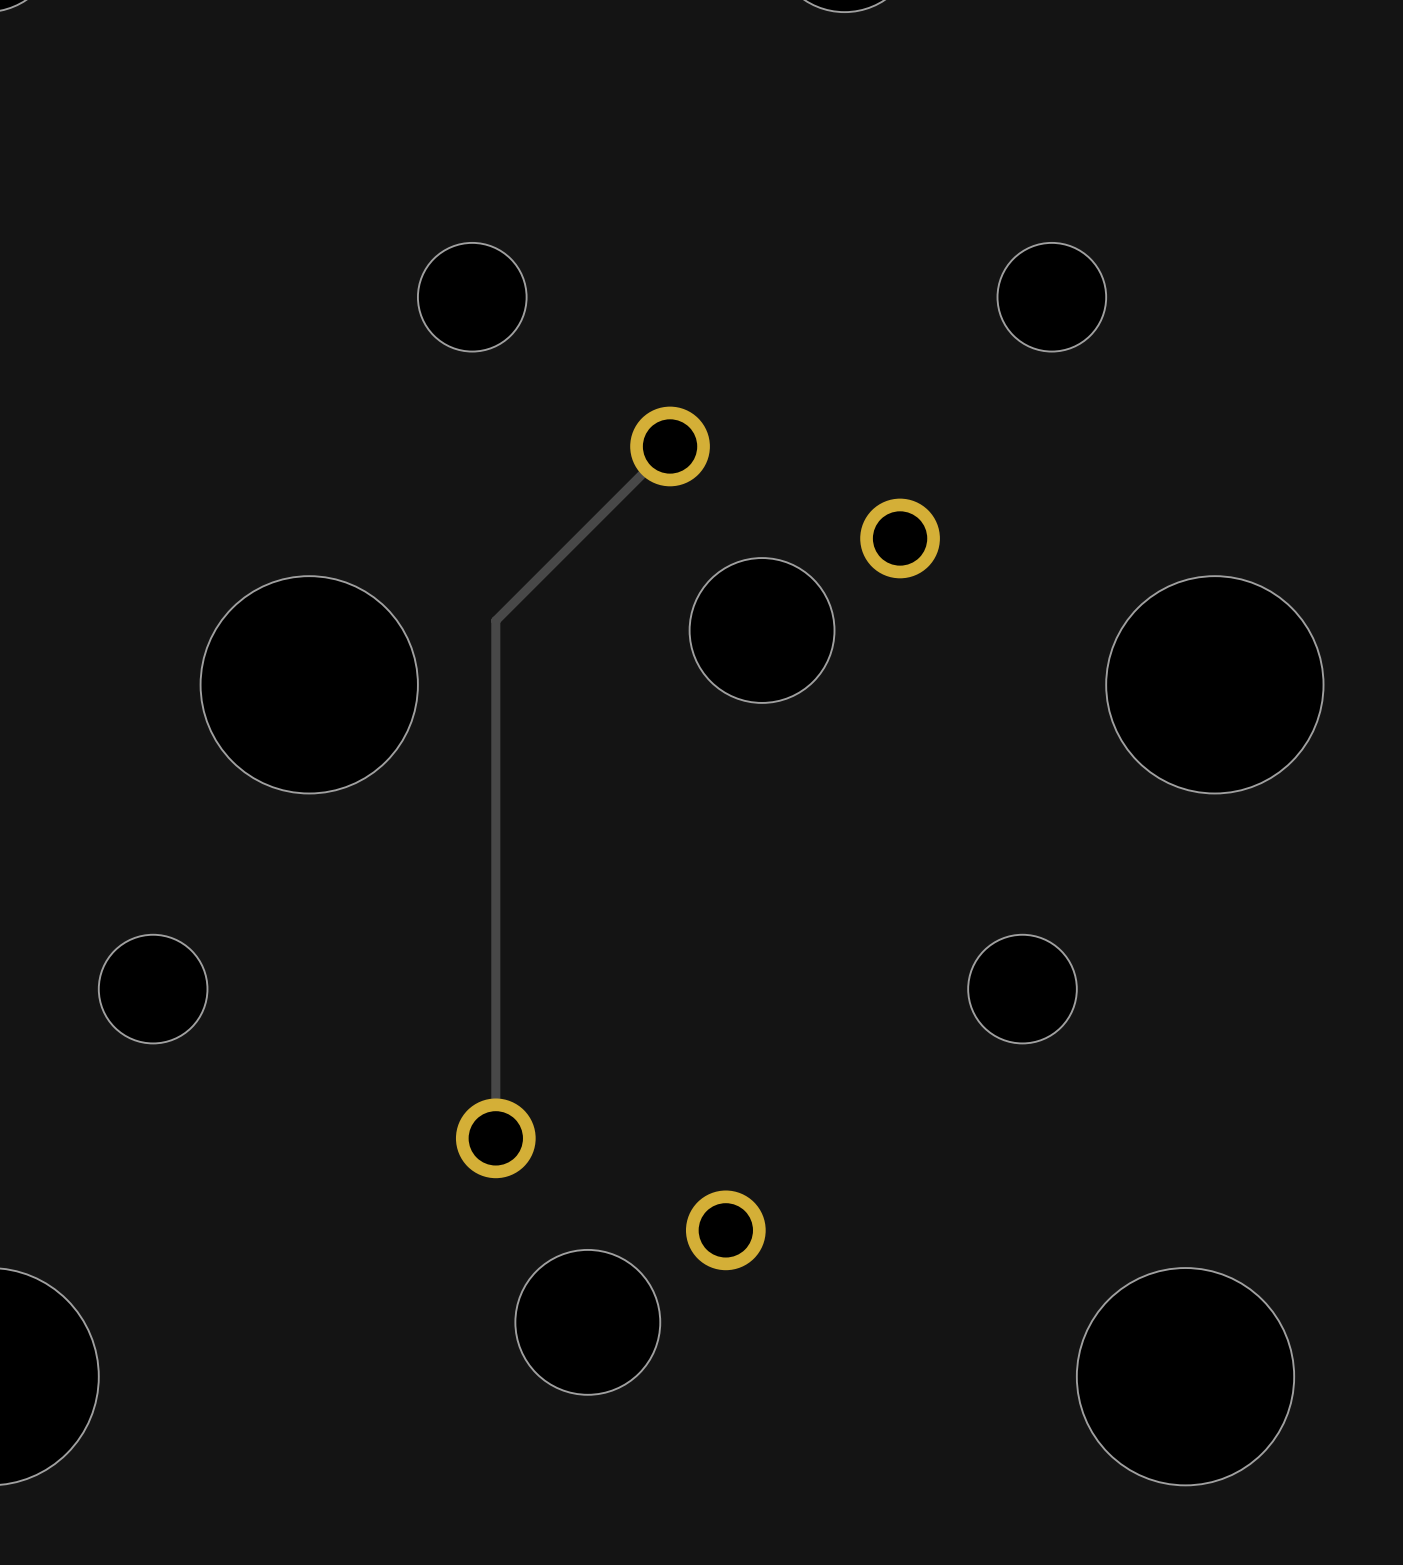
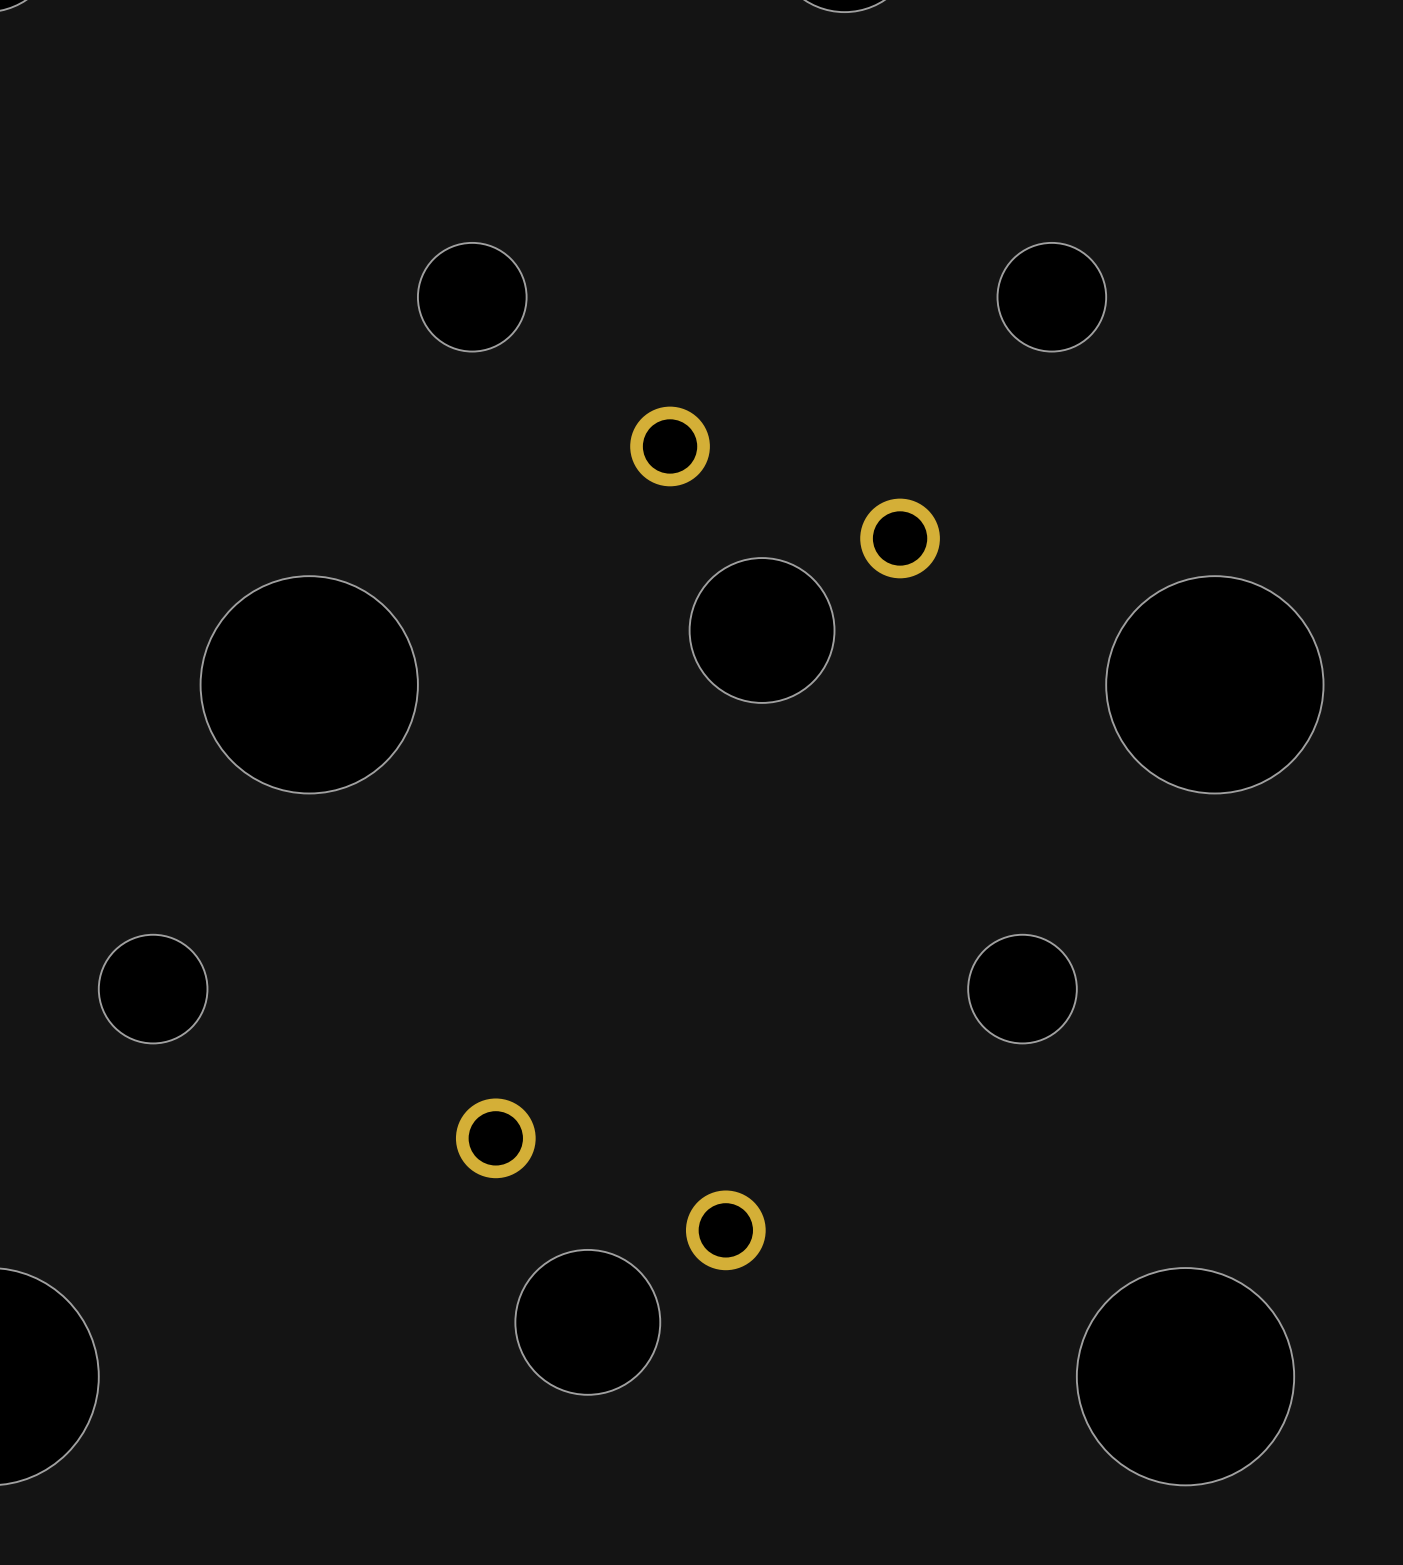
track: (670, 446) (495, 620) (495, 1138) -> none

